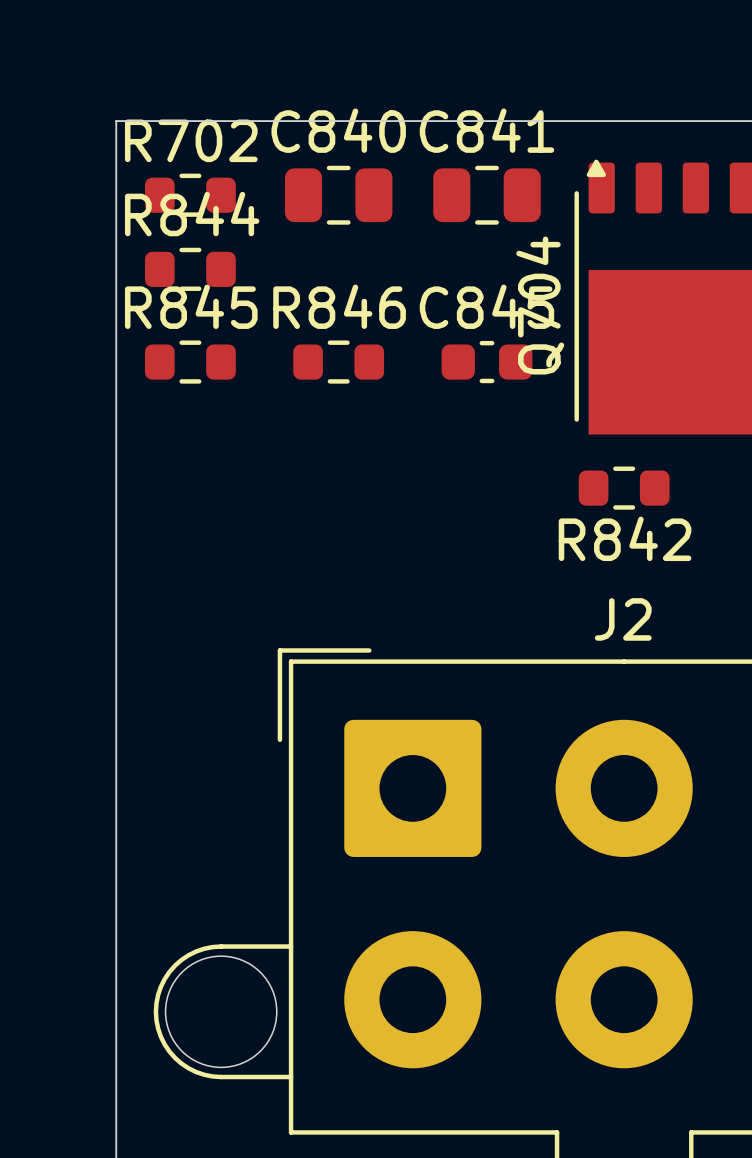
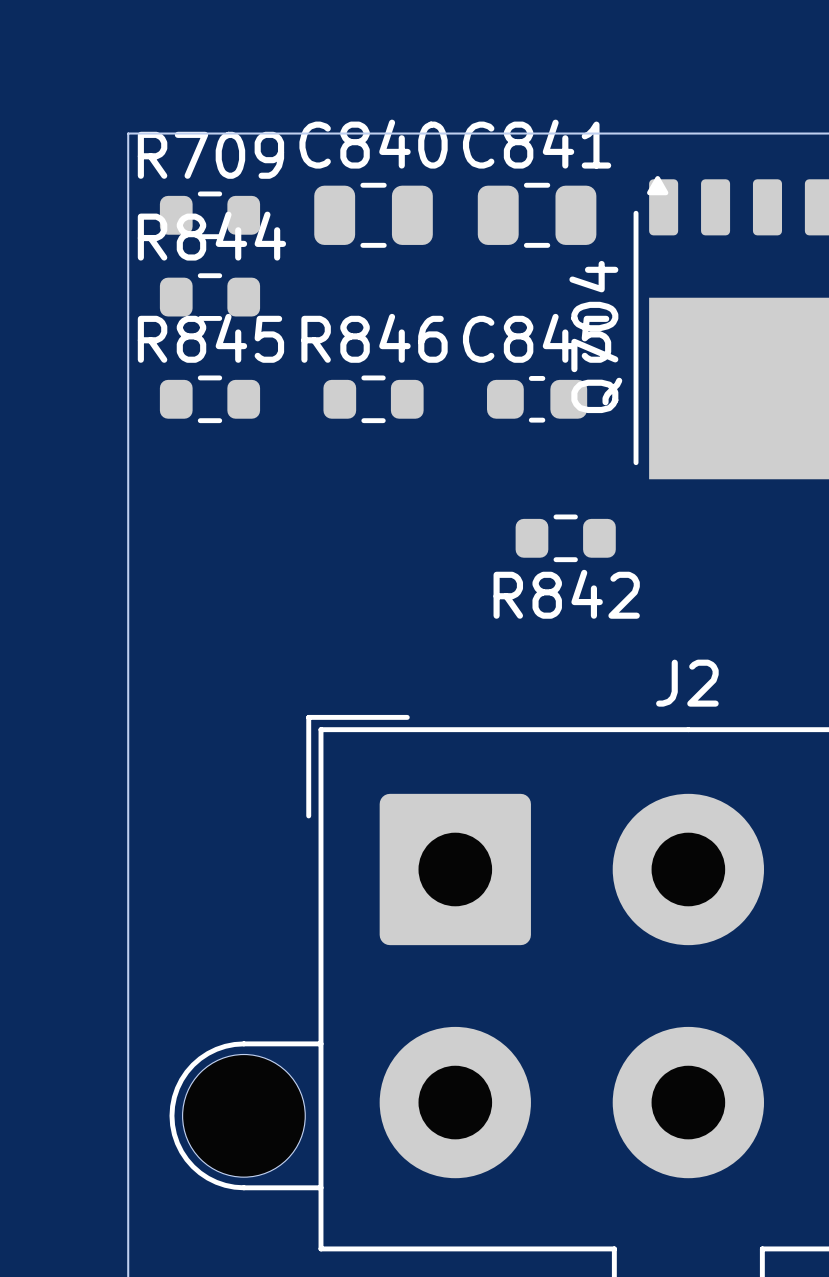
R702 name: R702 (191, 140) -> R709 (210, 155)
R842 position: (624, 488) -> (565, 538)

